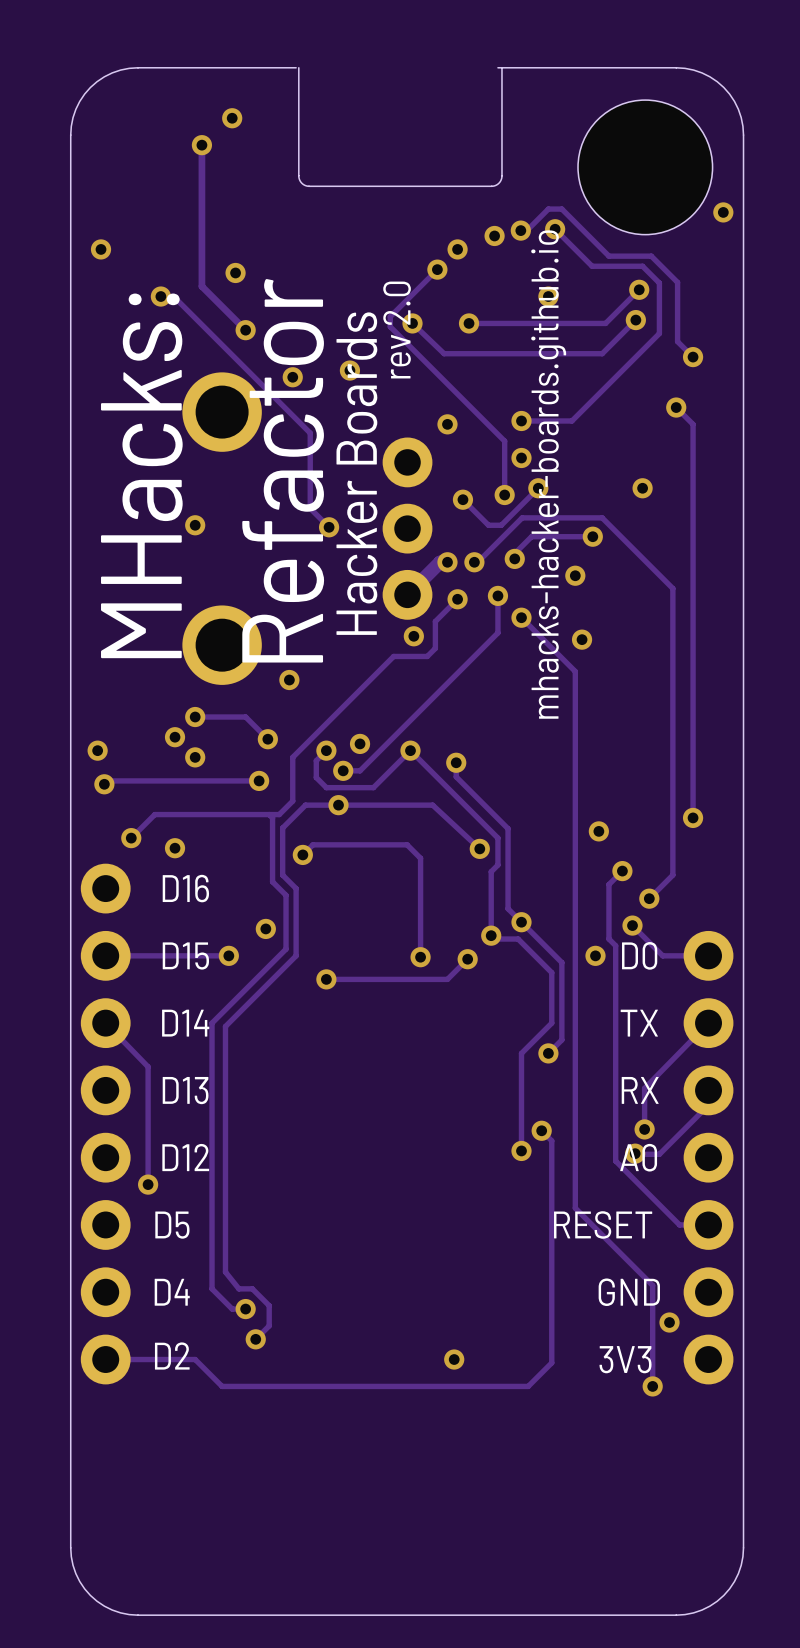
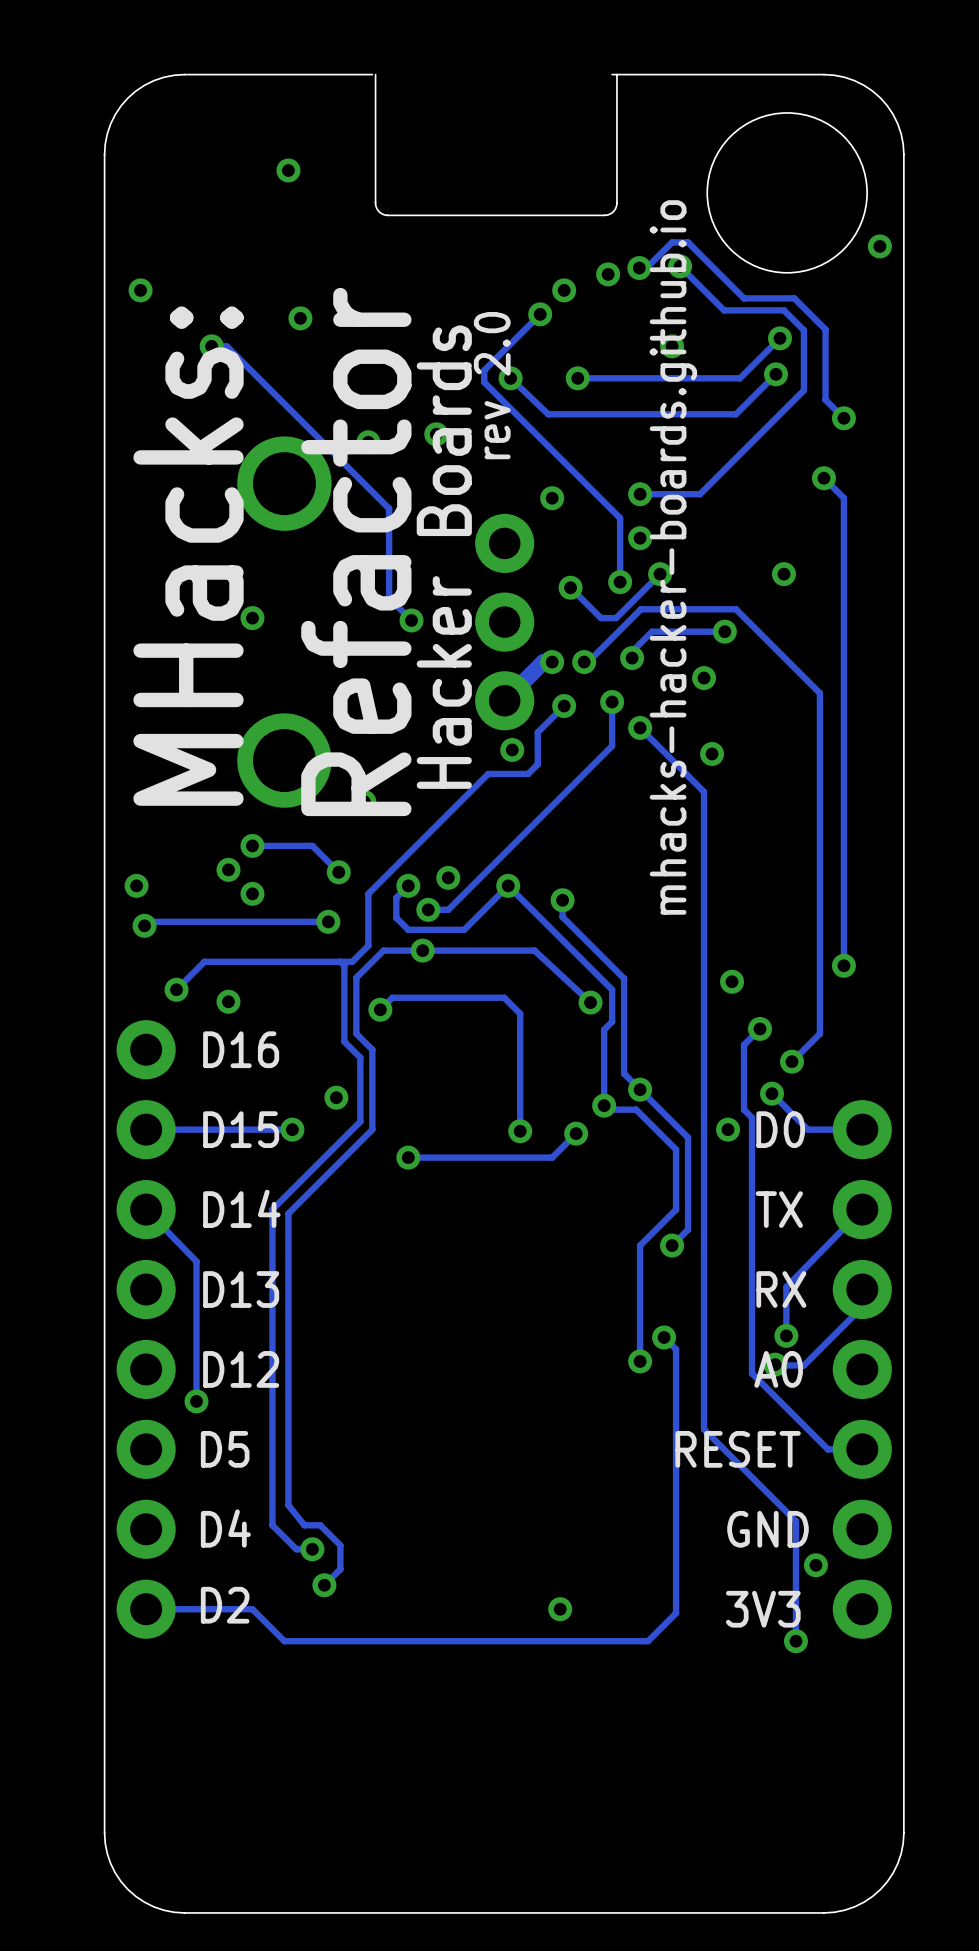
via: (232, 118) -> none
track: (201, 145) (201, 286) (245, 330) -> none
via: (201, 145) -> none
via: none -> (288, 170)
via: (245, 330) -> none

